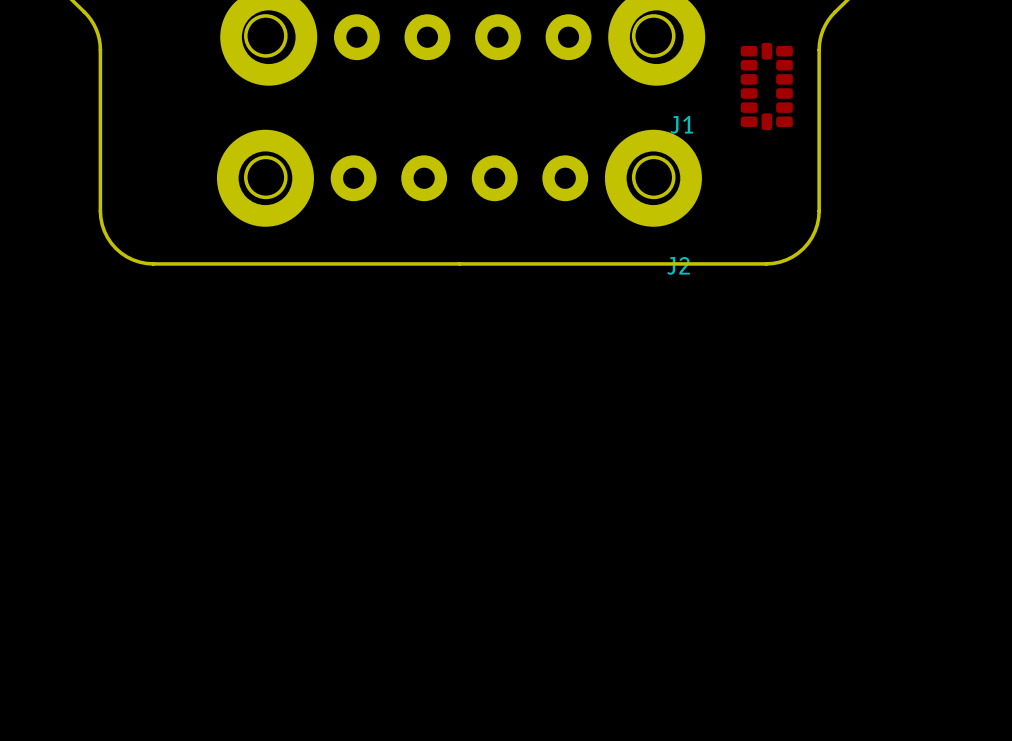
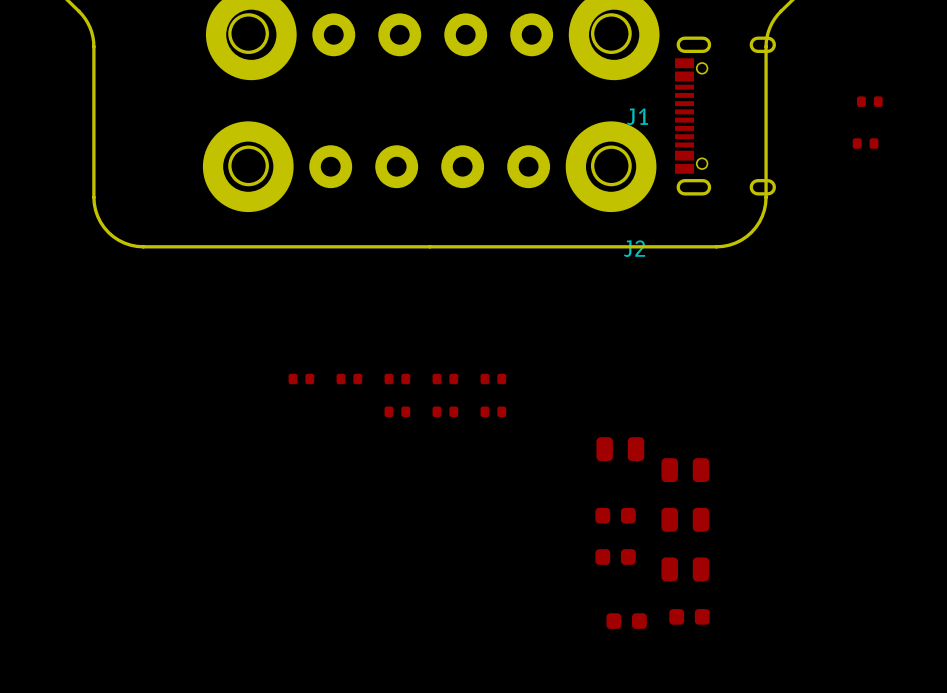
part: (766, 86) -> none
part: none -> (869, 101)
part: none -> (725, 116)
part: none -> (865, 143)
part: none -> (301, 378)
part: none -> (349, 378)
part: none -> (397, 378)
part: none -> (445, 378)
part: none -> (493, 378)
part: none -> (397, 411)
part: none -> (445, 411)
part: none -> (493, 411)
part: none -> (620, 449)
part: none -> (685, 470)
part: none -> (615, 515)
part: none -> (685, 519)
part: none -> (615, 557)
part: none -> (685, 569)
part: none -> (689, 616)
part: none -> (626, 621)

